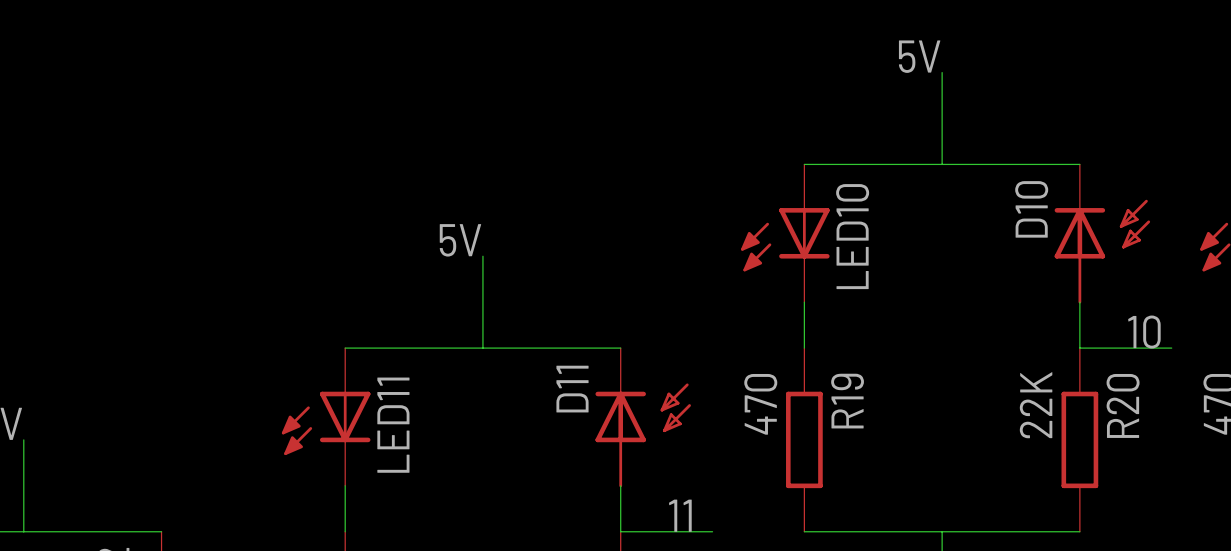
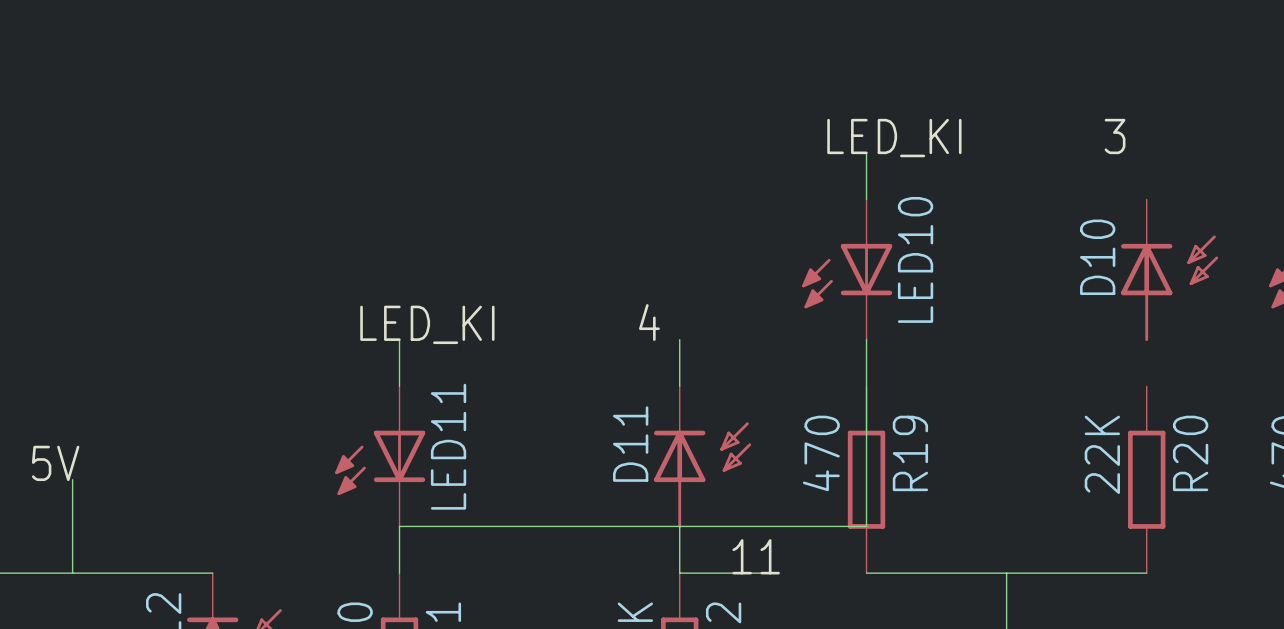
label: 5V (919, 56) -> none
wire: (942, 72) (942, 164) -> none
label: none -> LED_KI (894, 138)
label: none -> 3 (1115, 136)
wire: (804, 164) (1079, 164) -> (866, 199) (866, 152)
label: 5V (460, 240) -> none
wire: (482, 256) (482, 348) -> none
label: none -> LED_KI (427, 324)
label: none -> 4 (649, 322)
wire: none -> (679, 339) (679, 386)
wire: (1079, 302) (1079, 348) (1171, 348) -> none
label: 10 (1144, 332) -> none
wire: (345, 348) (620, 348) -> (399, 386) (399, 339)
wire: none -> (866, 386) (866, 526) (399, 526)

